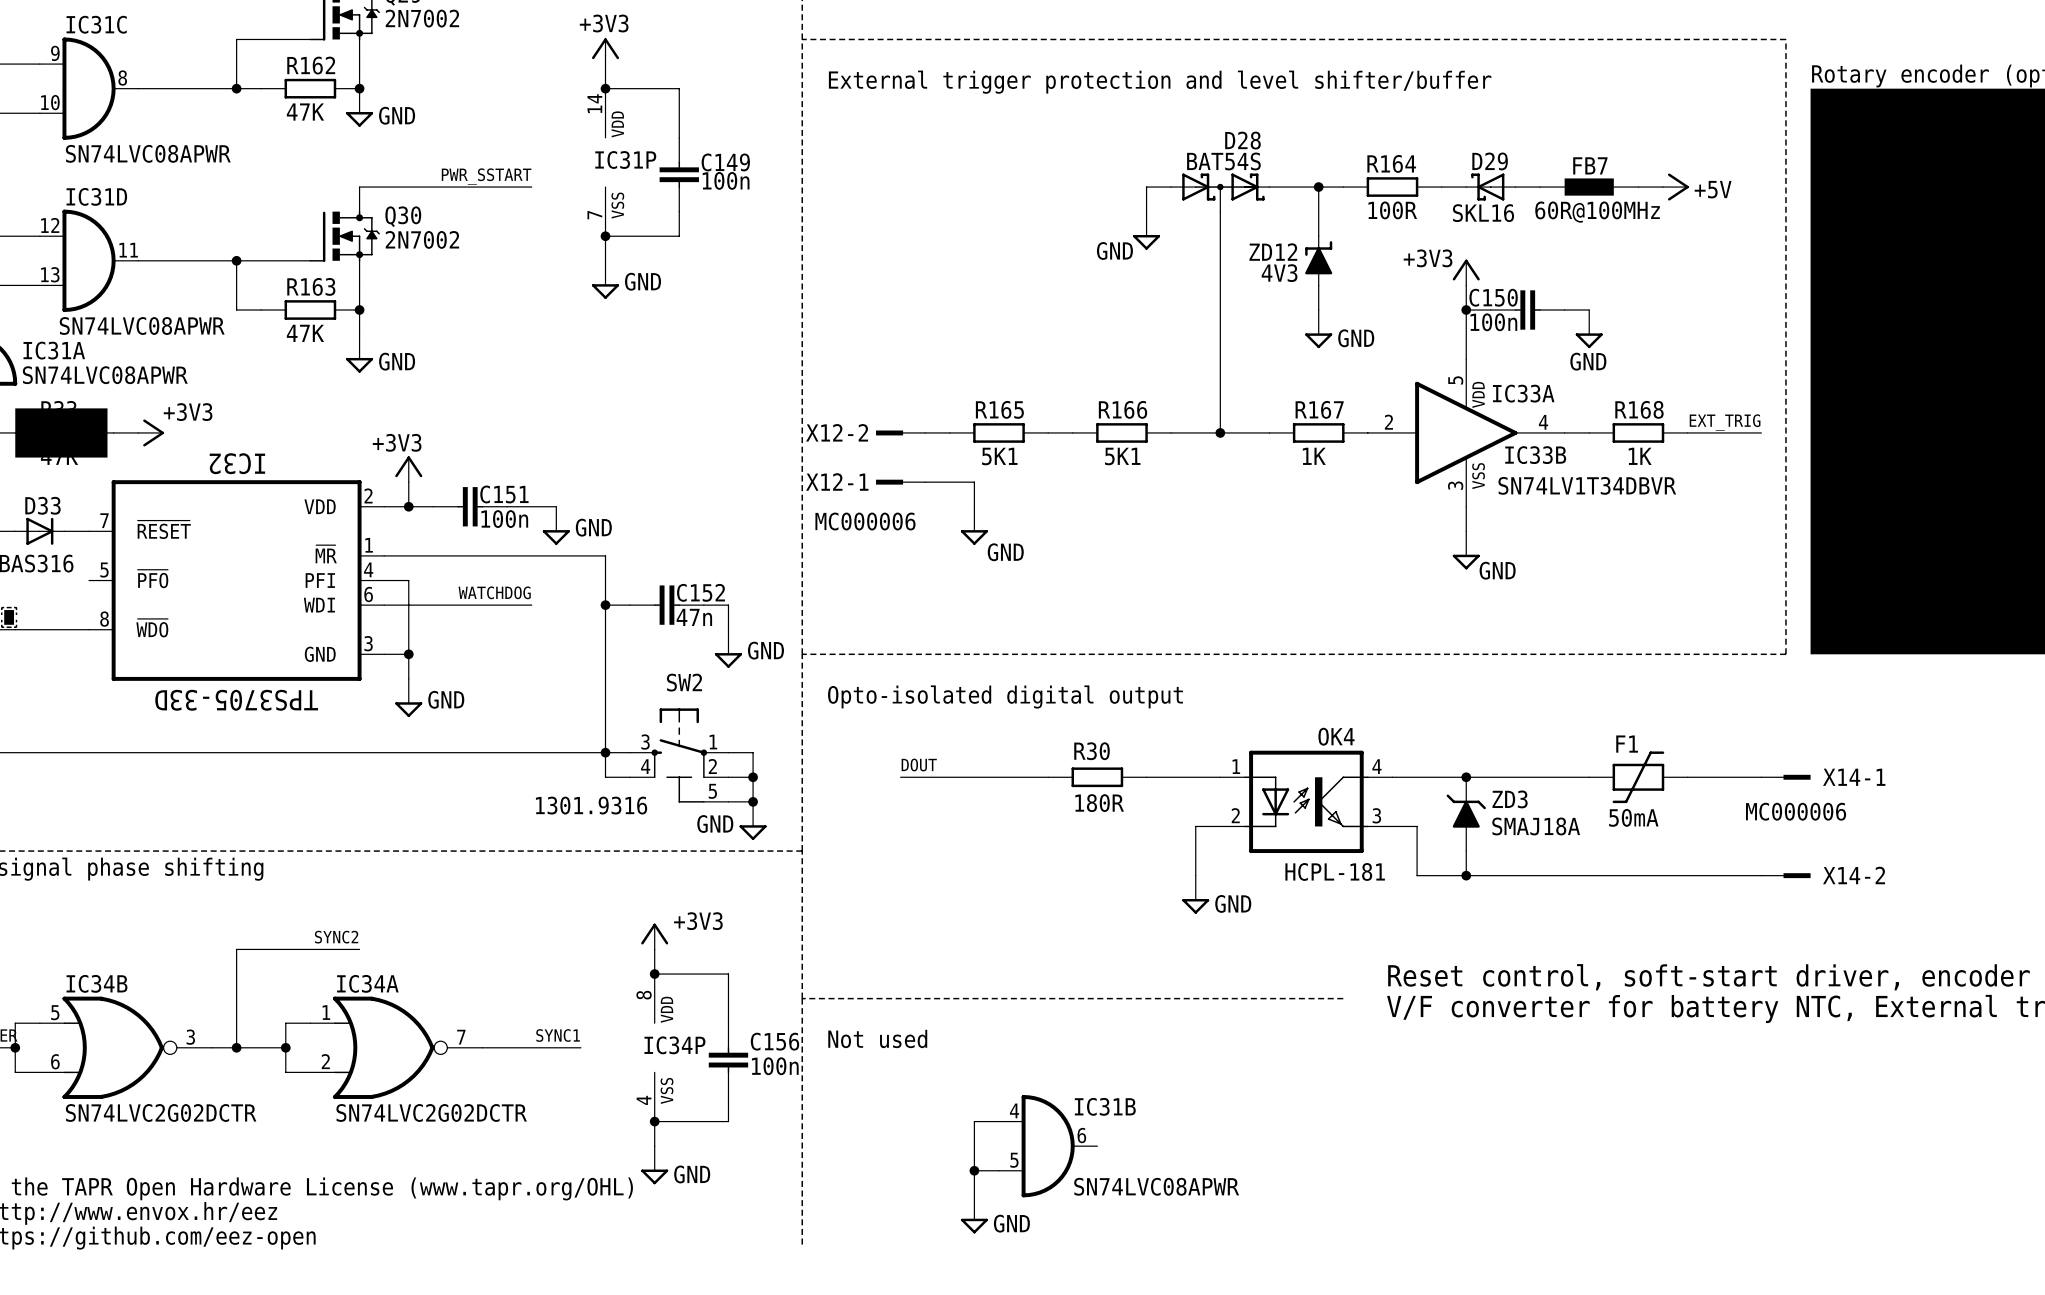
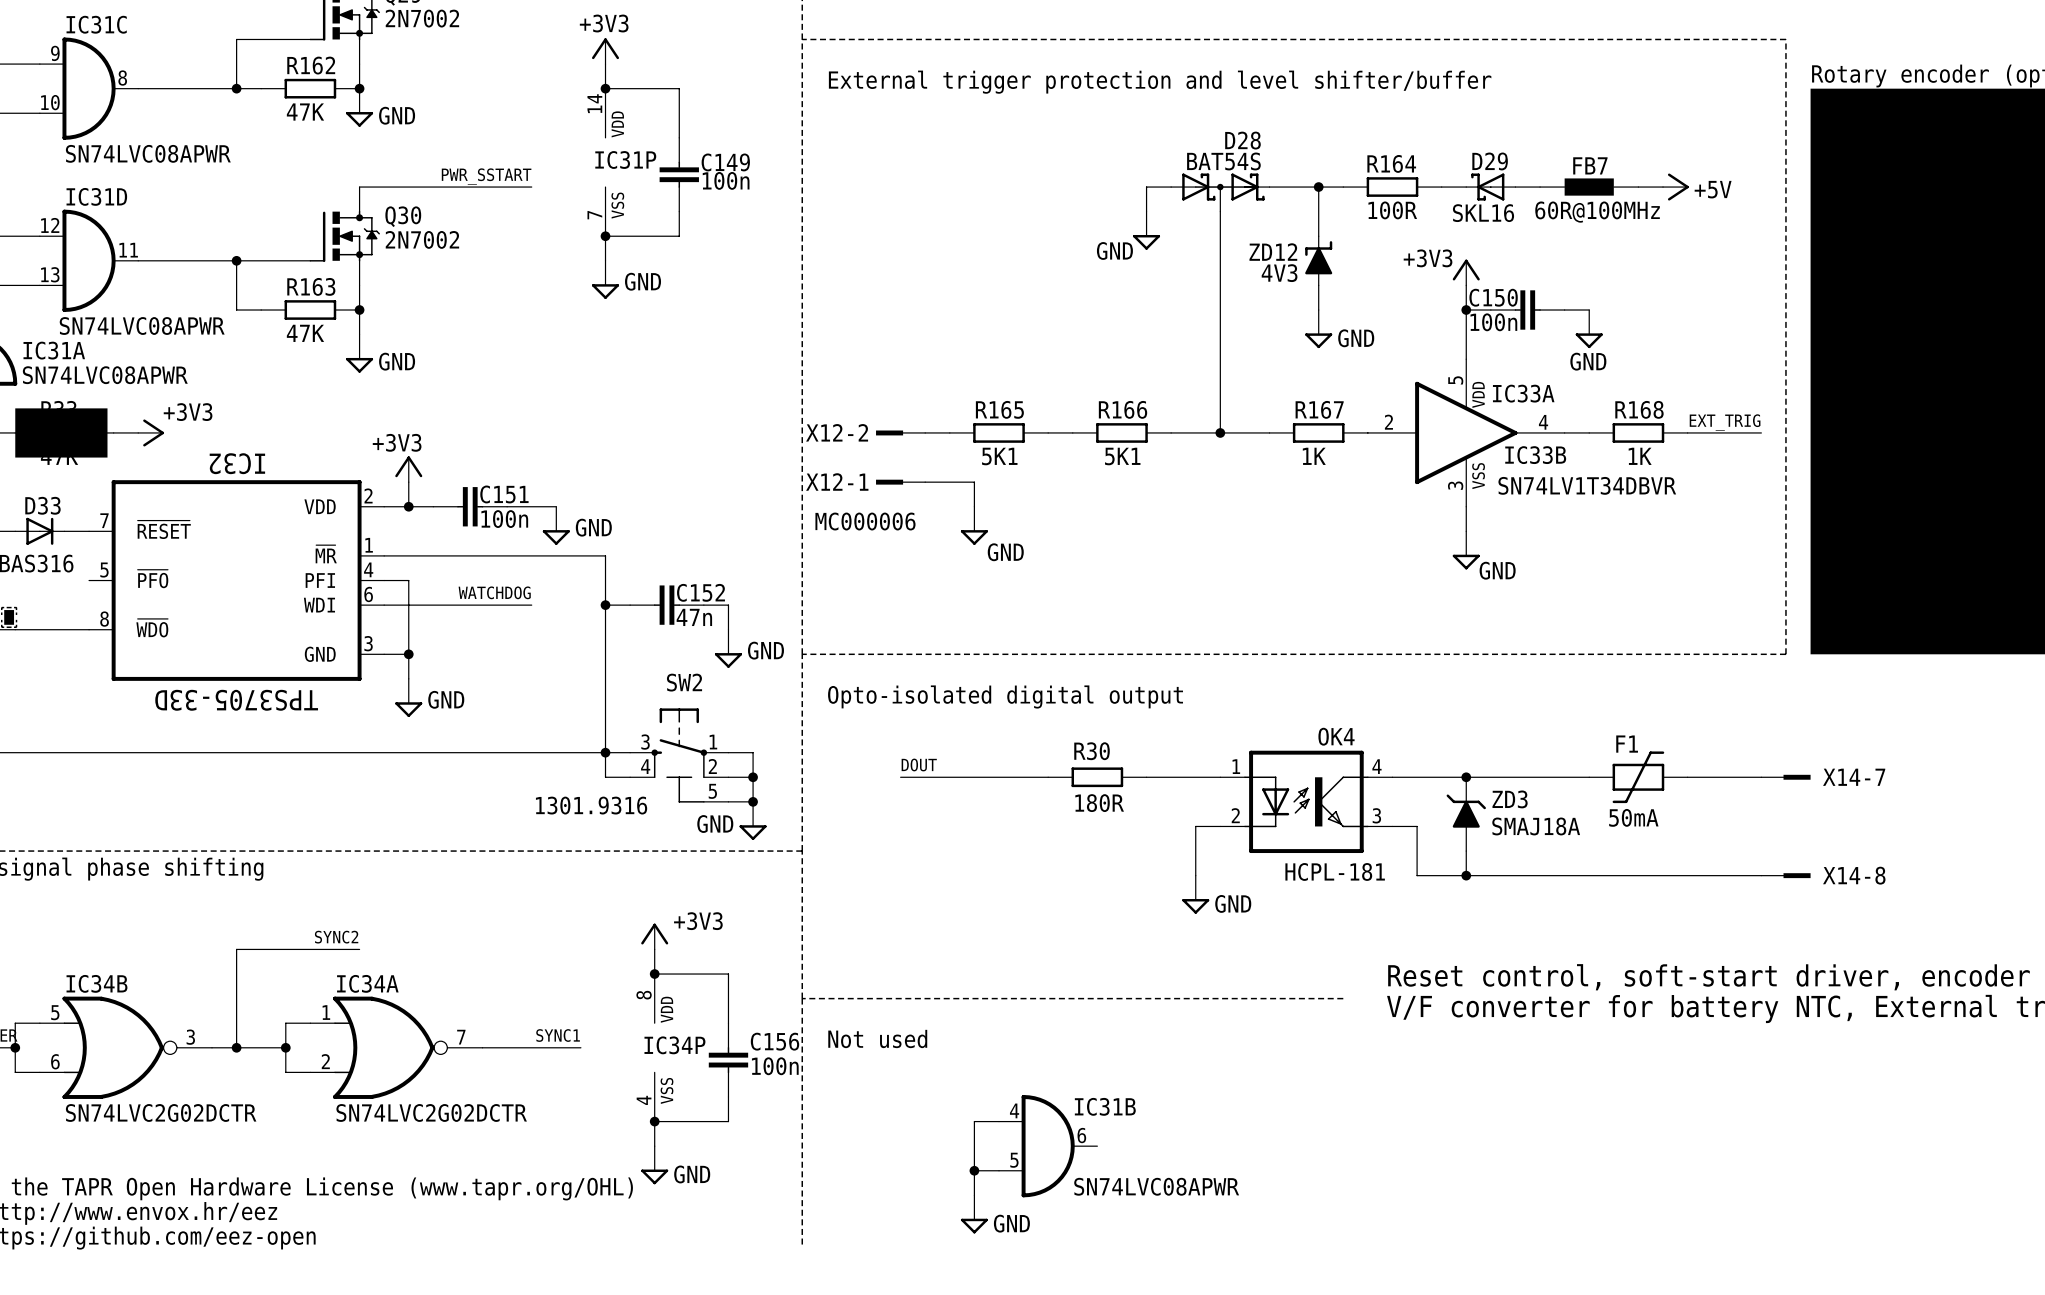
X14-1 name: X14-1 (1854, 777) -> X14-7 (1854, 777)
X14-1 value: MC000006 (1796, 811) -> none
X14-2 name: X14-2 (1854, 875) -> X14-8 (1854, 875)

